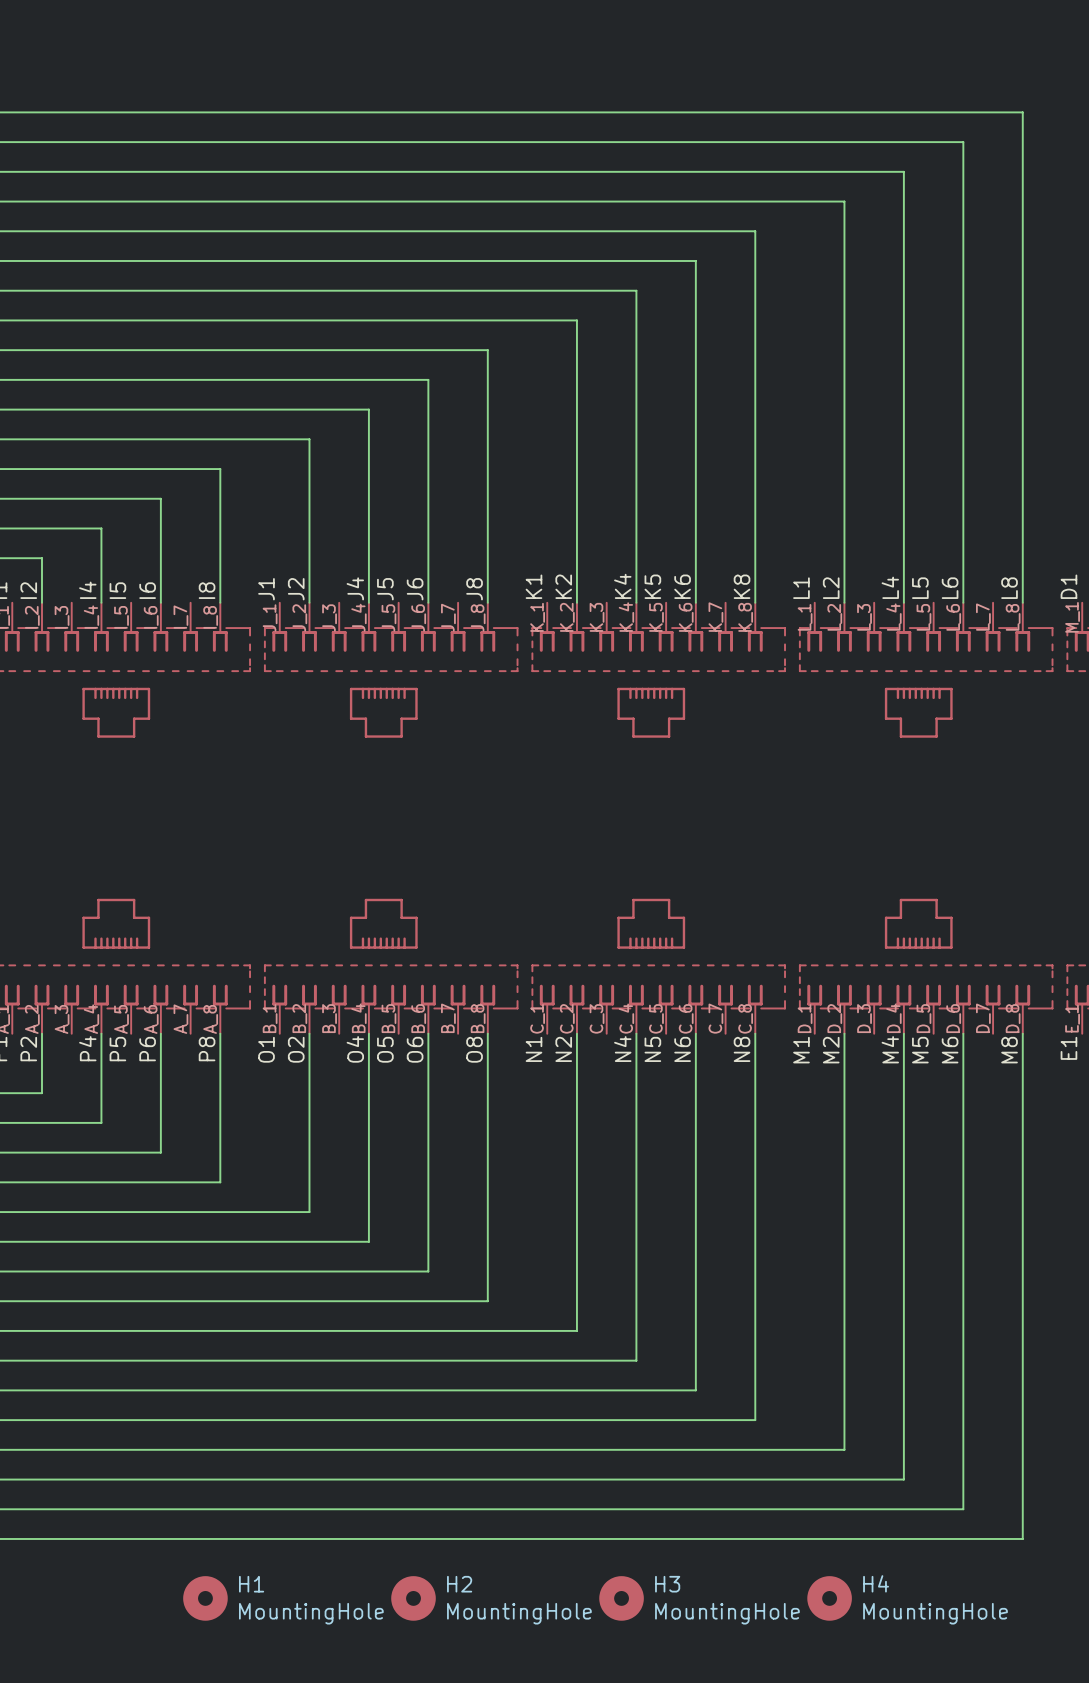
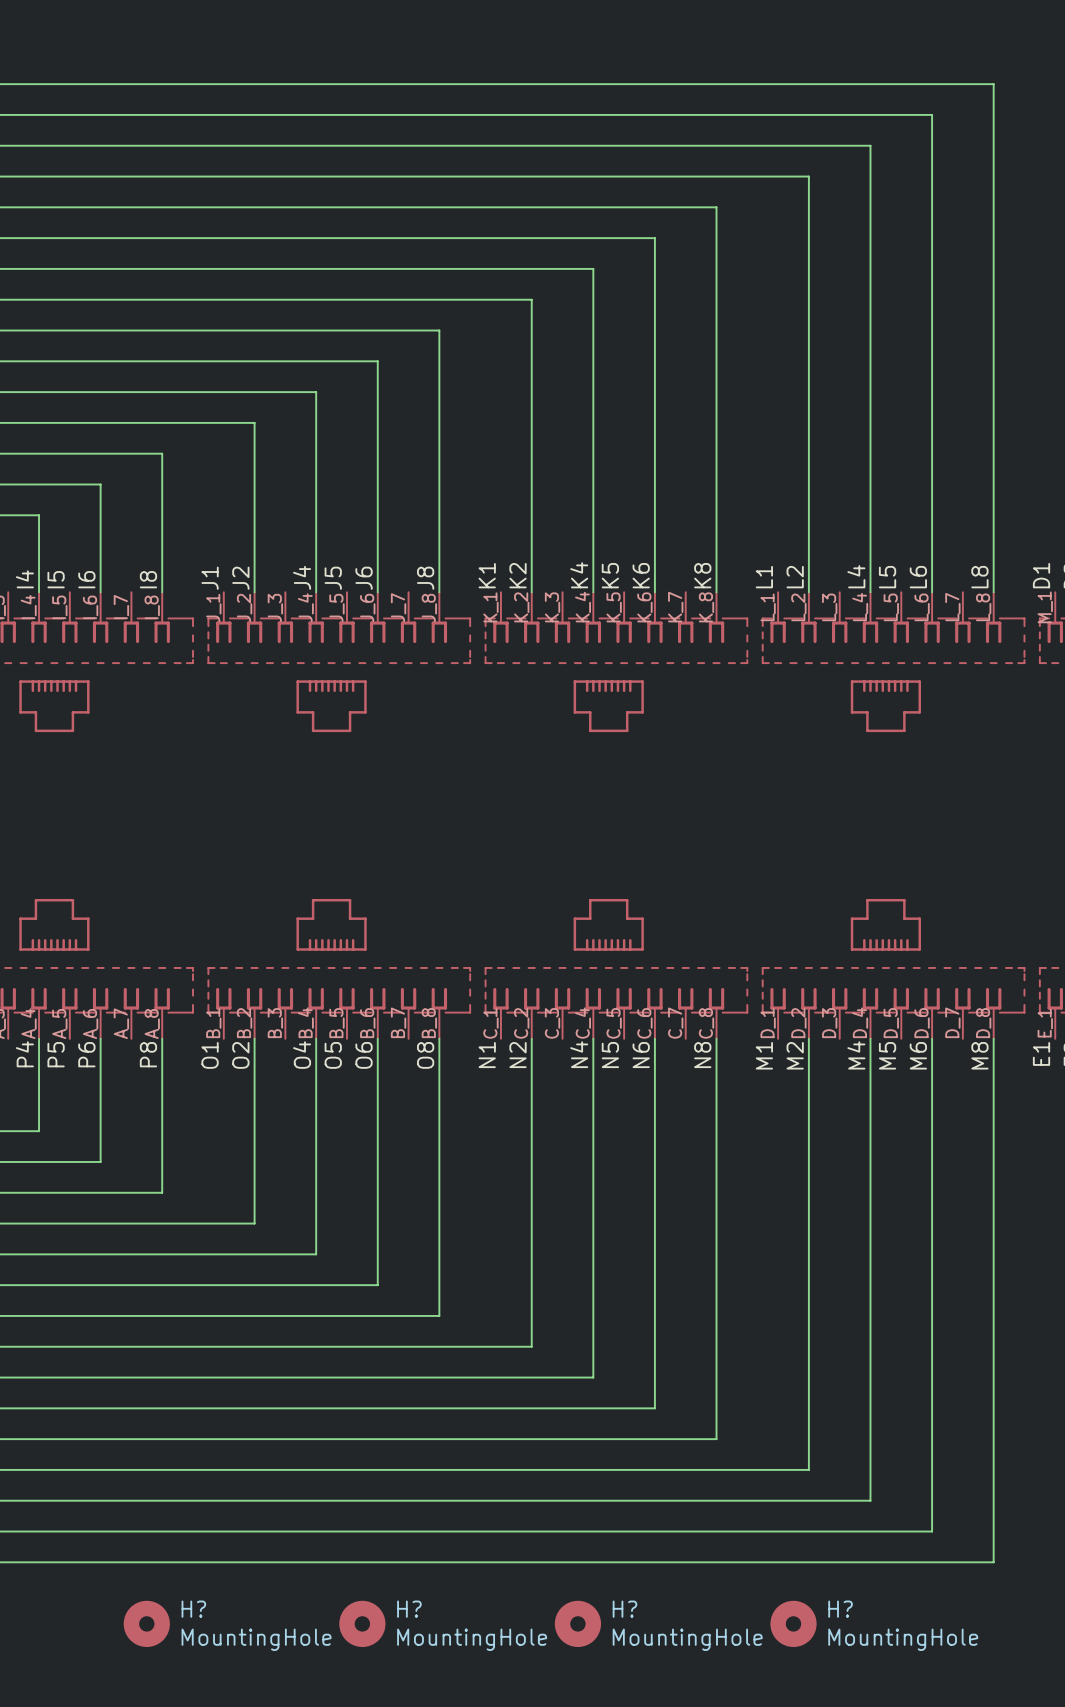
H4 name: H4 (876, 1583) -> H? (840, 1609)
H1 name: H1 (251, 1584) -> H? (193, 1609)
H2 name: H2 (459, 1584) -> H? (409, 1609)
H3 name: H3 (667, 1584) -> H? (624, 1609)

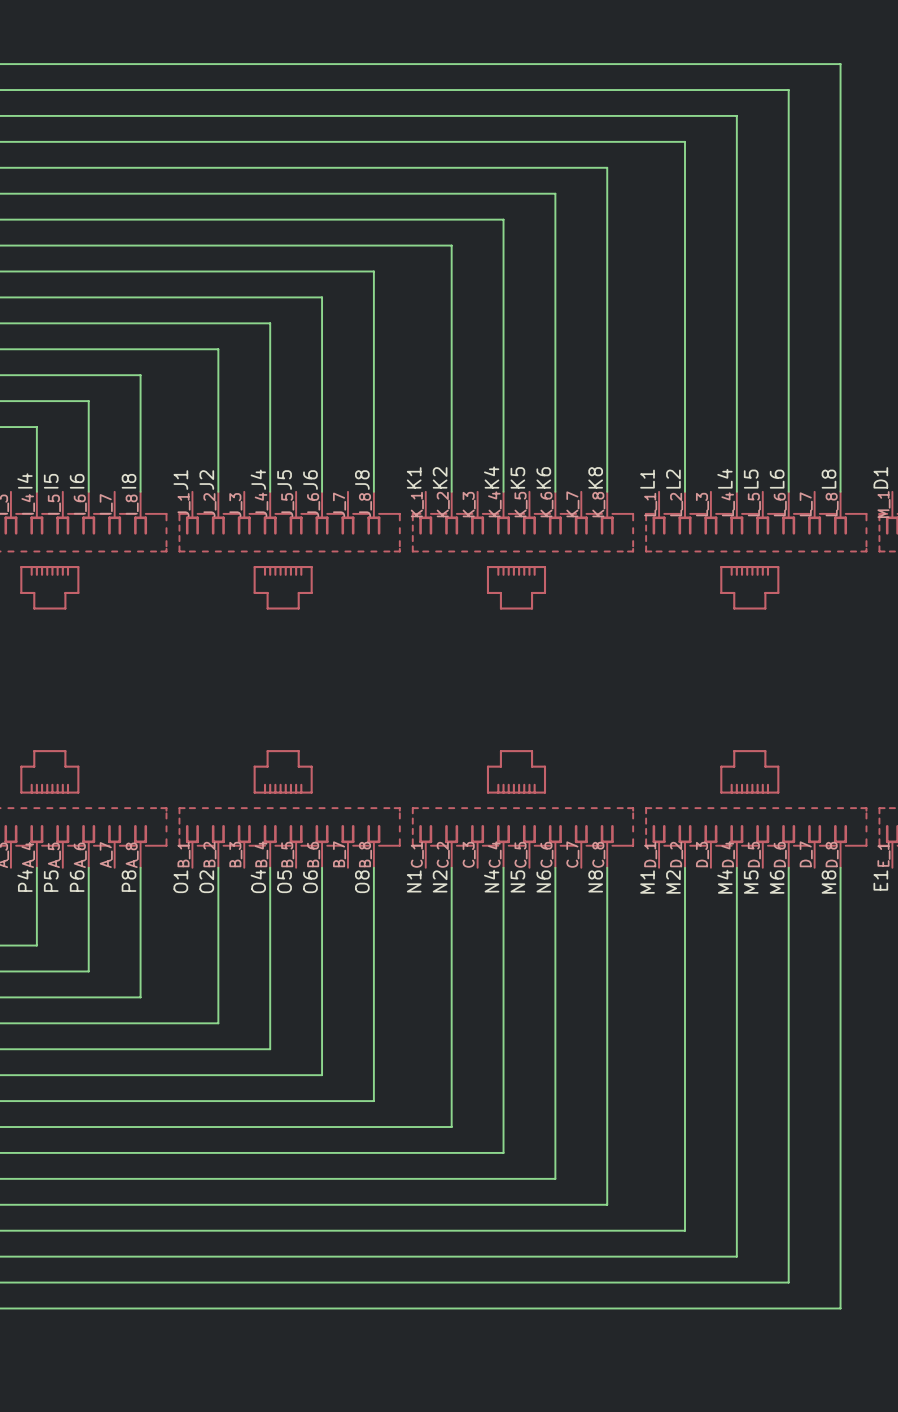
H?: MountingHole (146, 1623) -> none
H?: MountingHole (362, 1623) -> none
H?: MountingHole (577, 1623) -> none
H?: MountingHole (793, 1623) -> none

